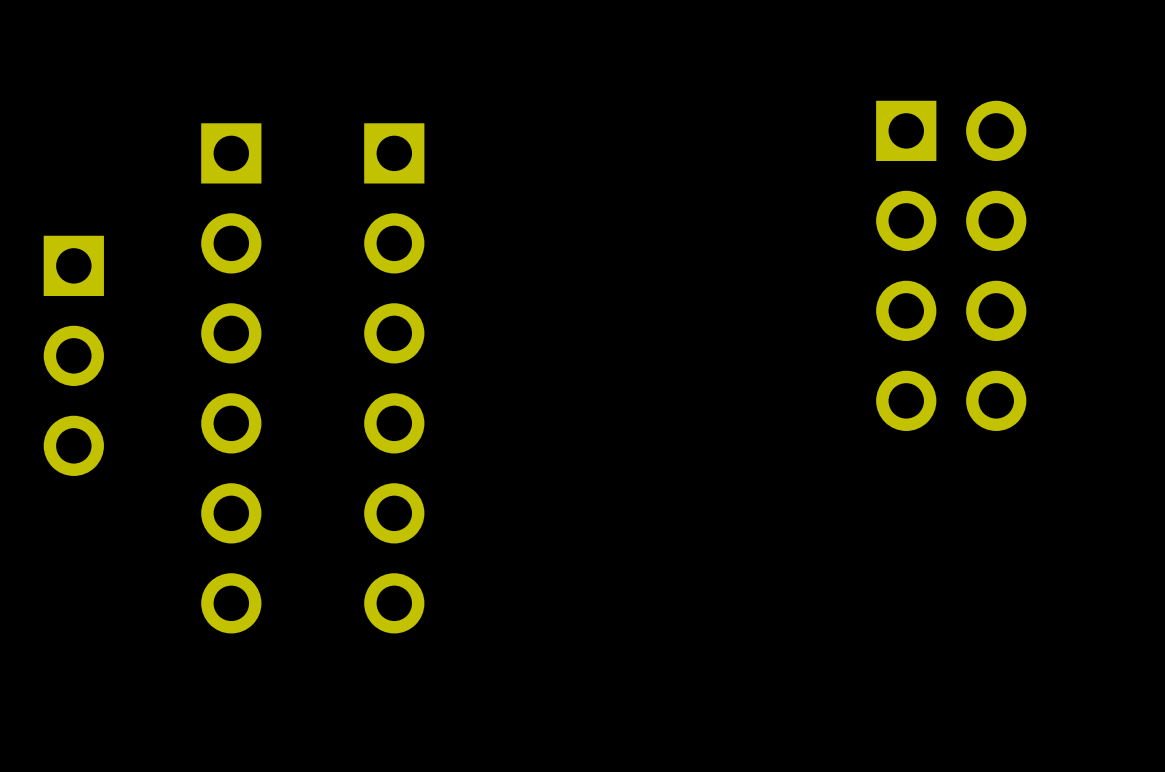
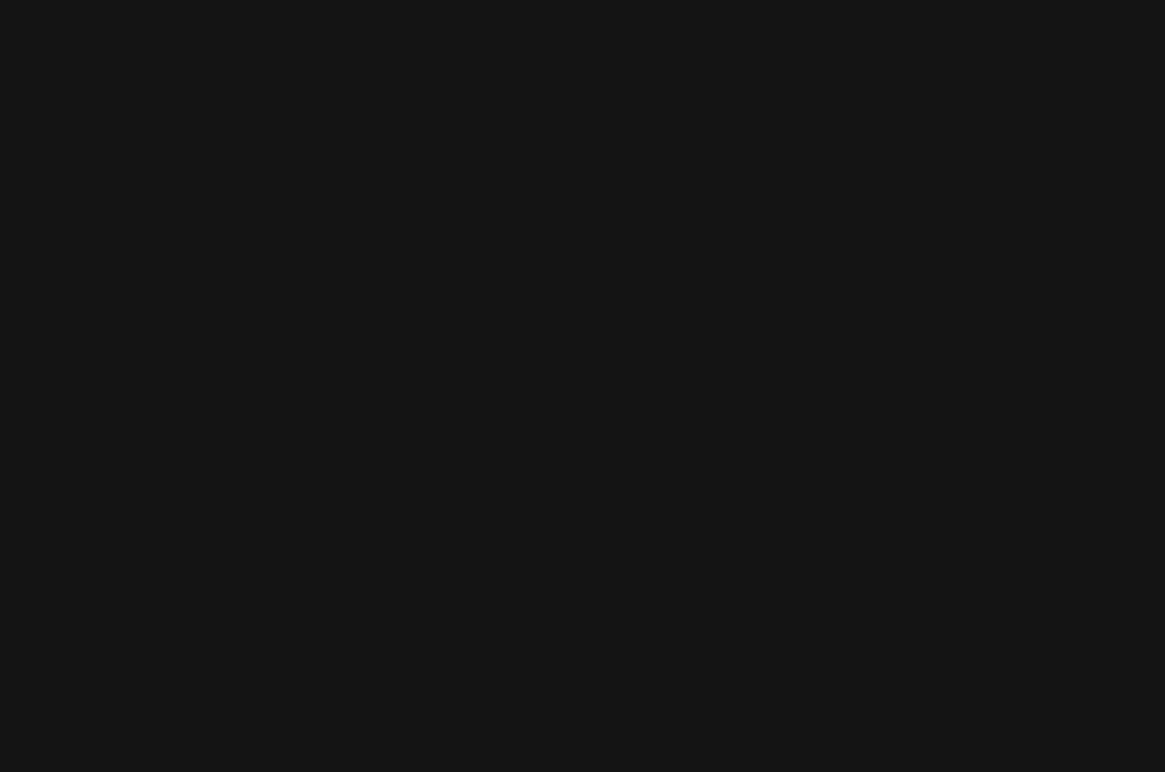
part: (951, 265) -> none
part: (73, 355) -> none
part: (231, 378) -> none
part: (394, 378) -> none

